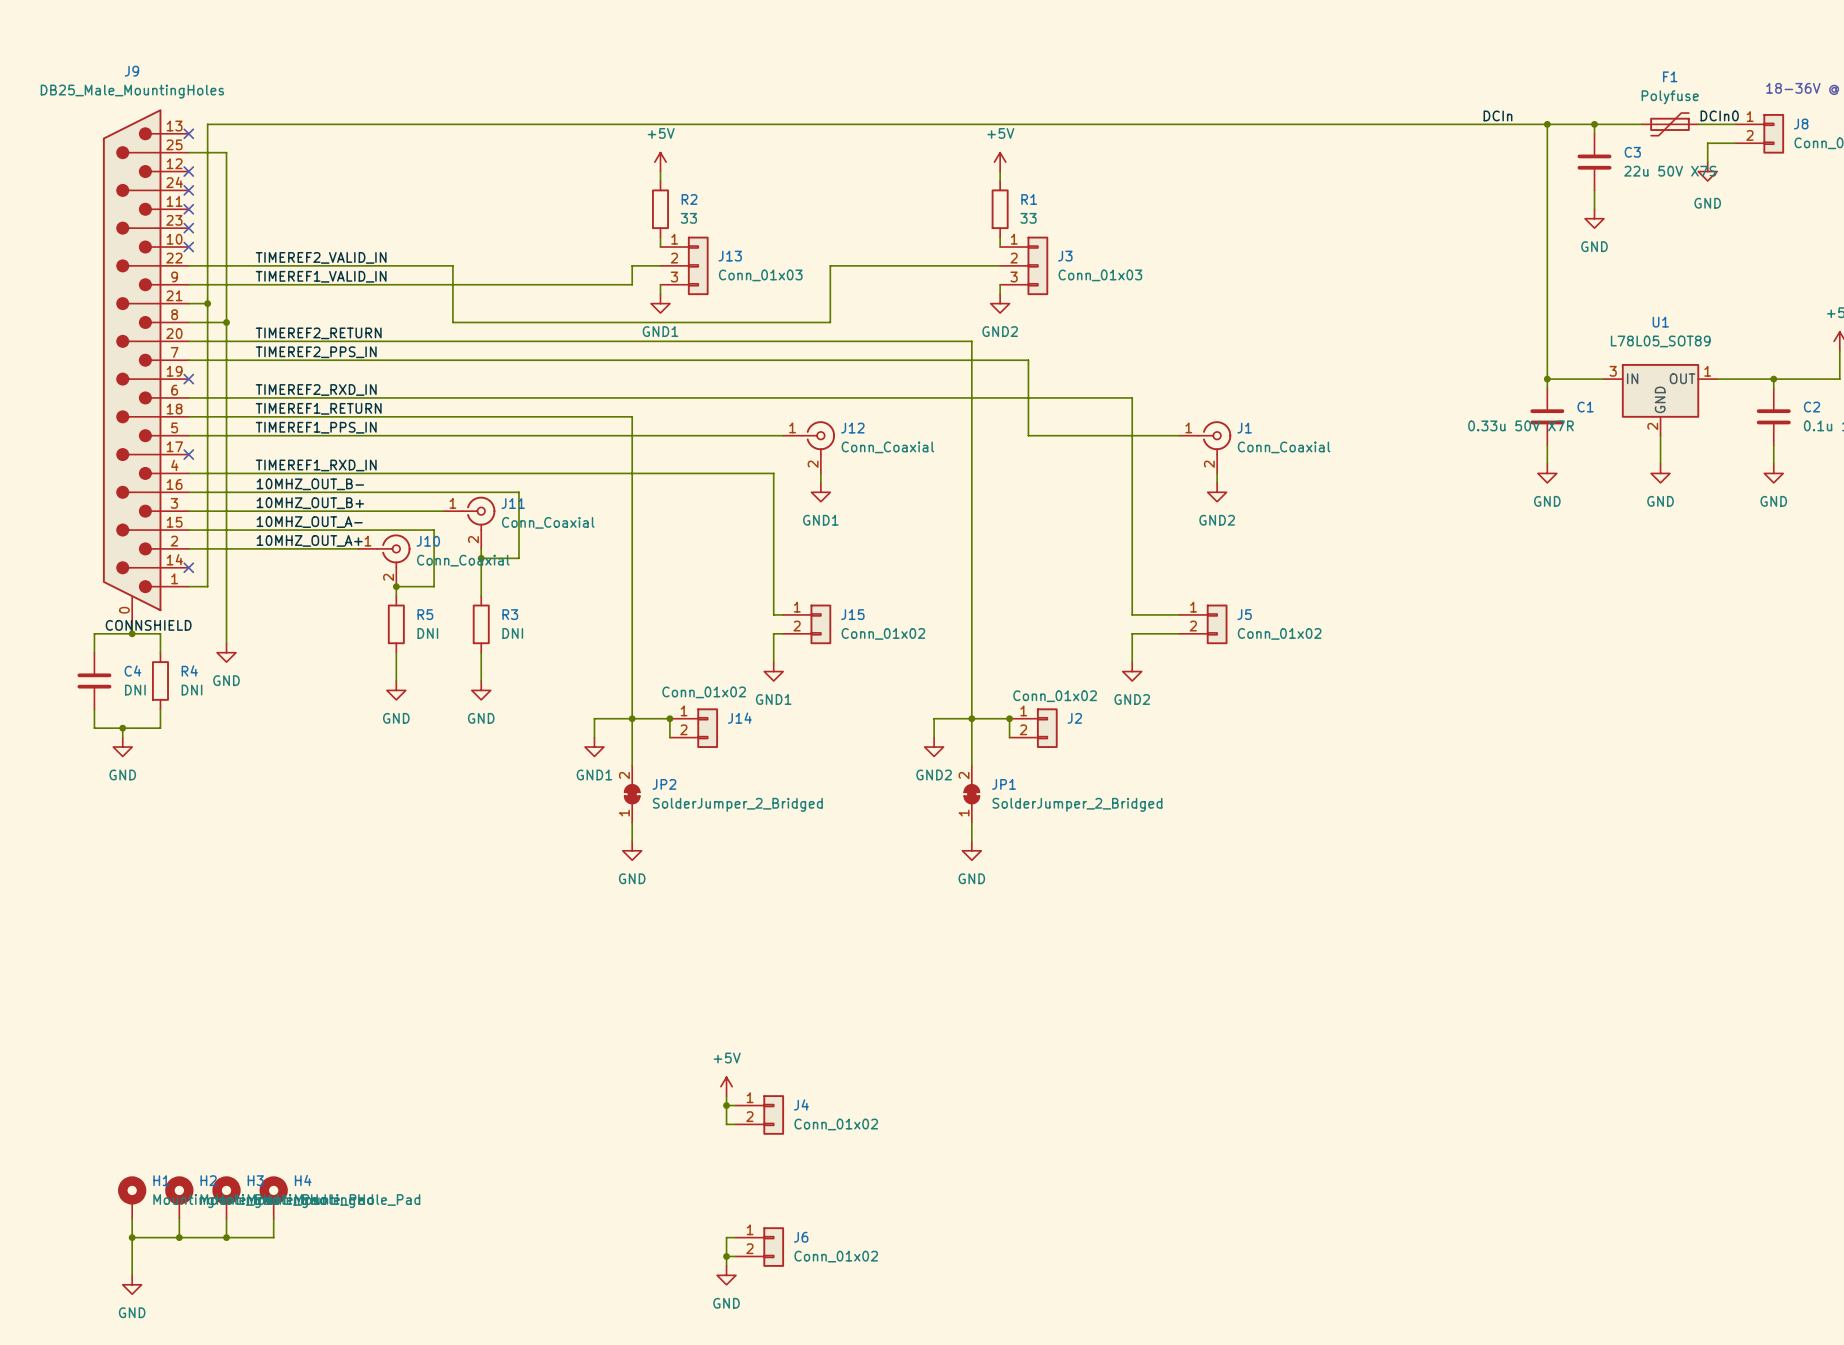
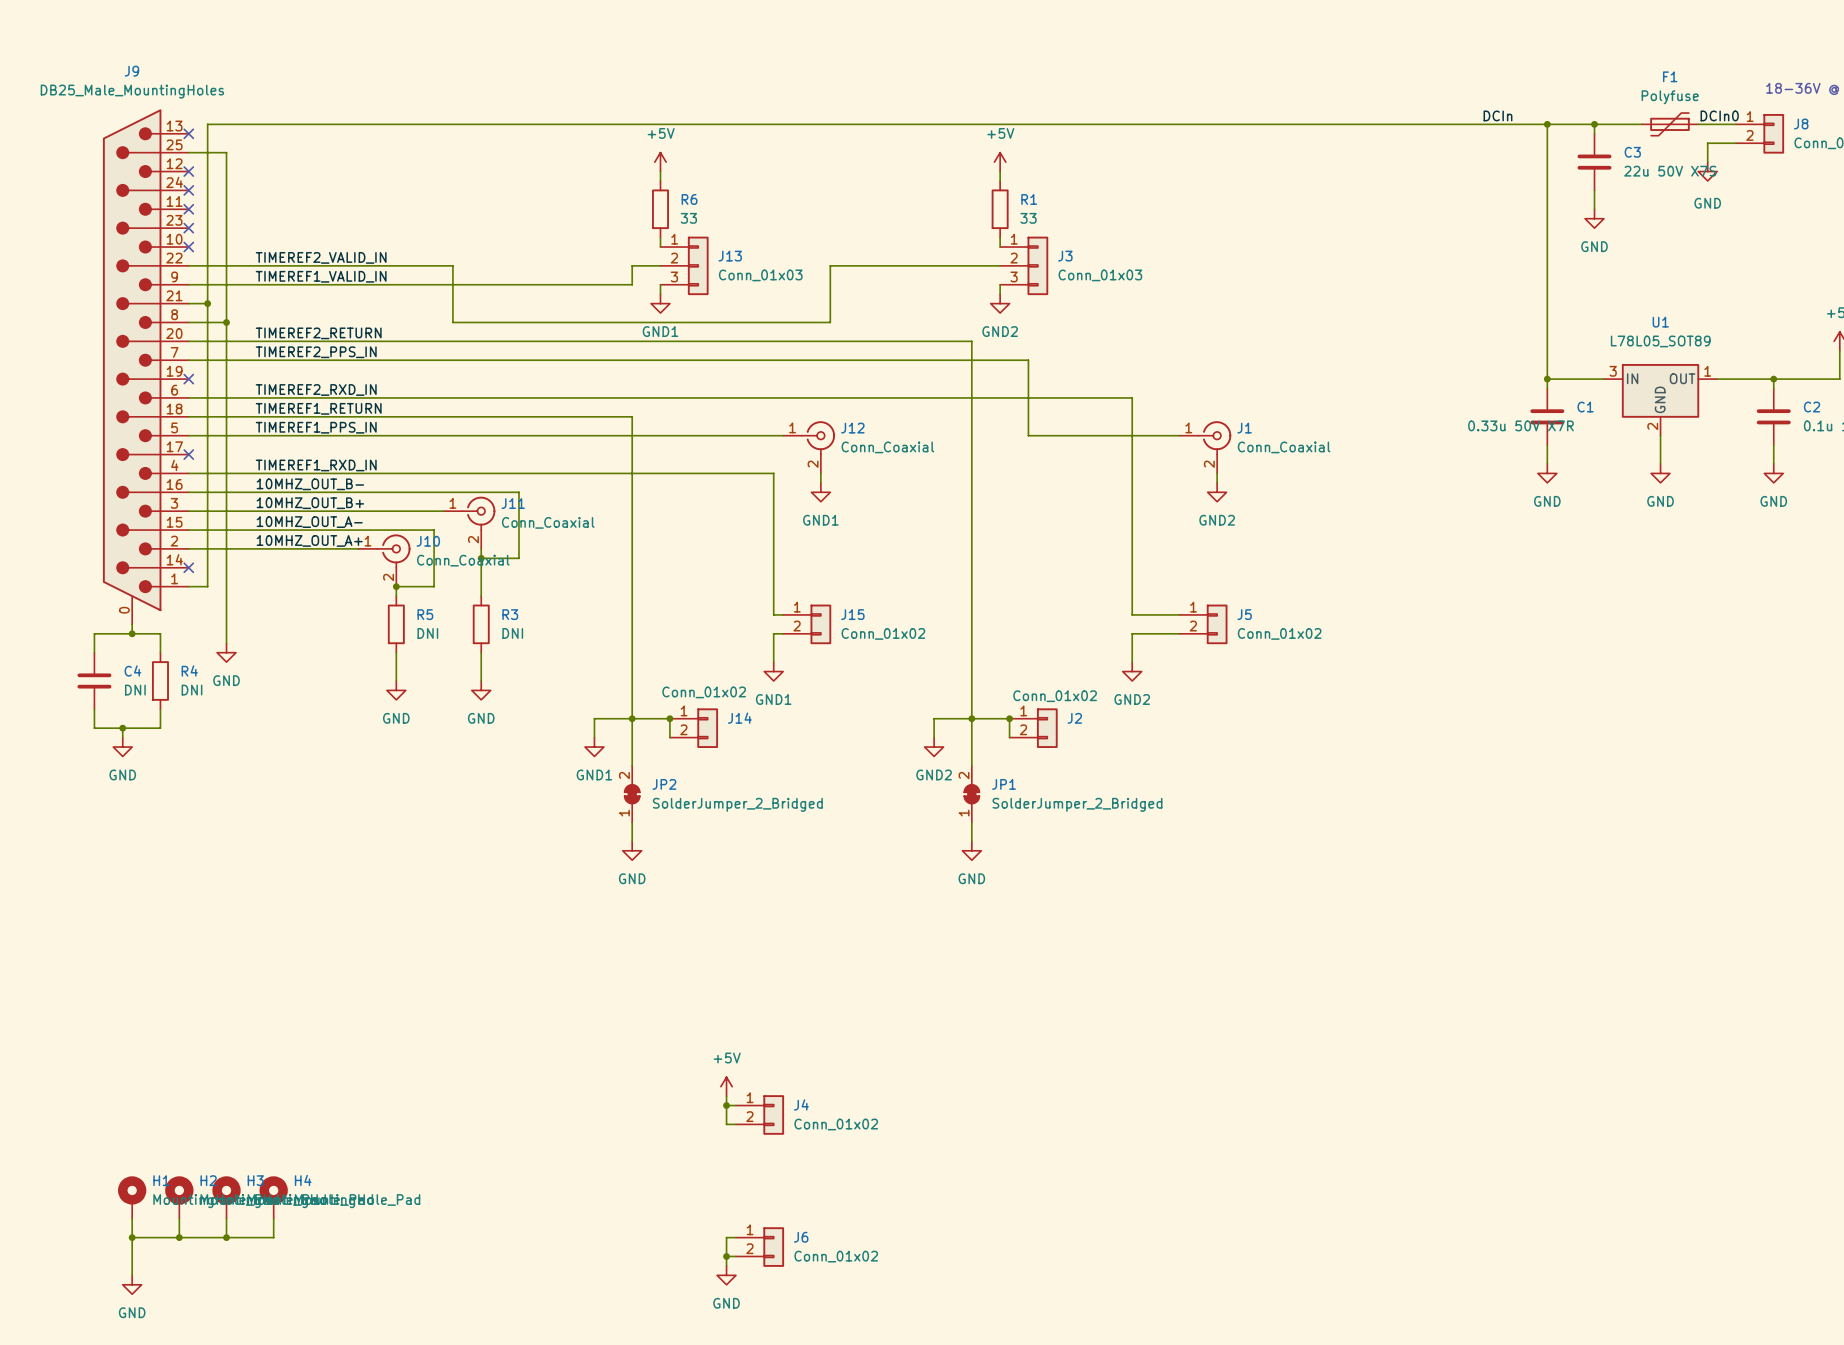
R2 name: R2 (689, 199) -> R6 (689, 199)
label: CONNSHIELD (148, 625) -> none

